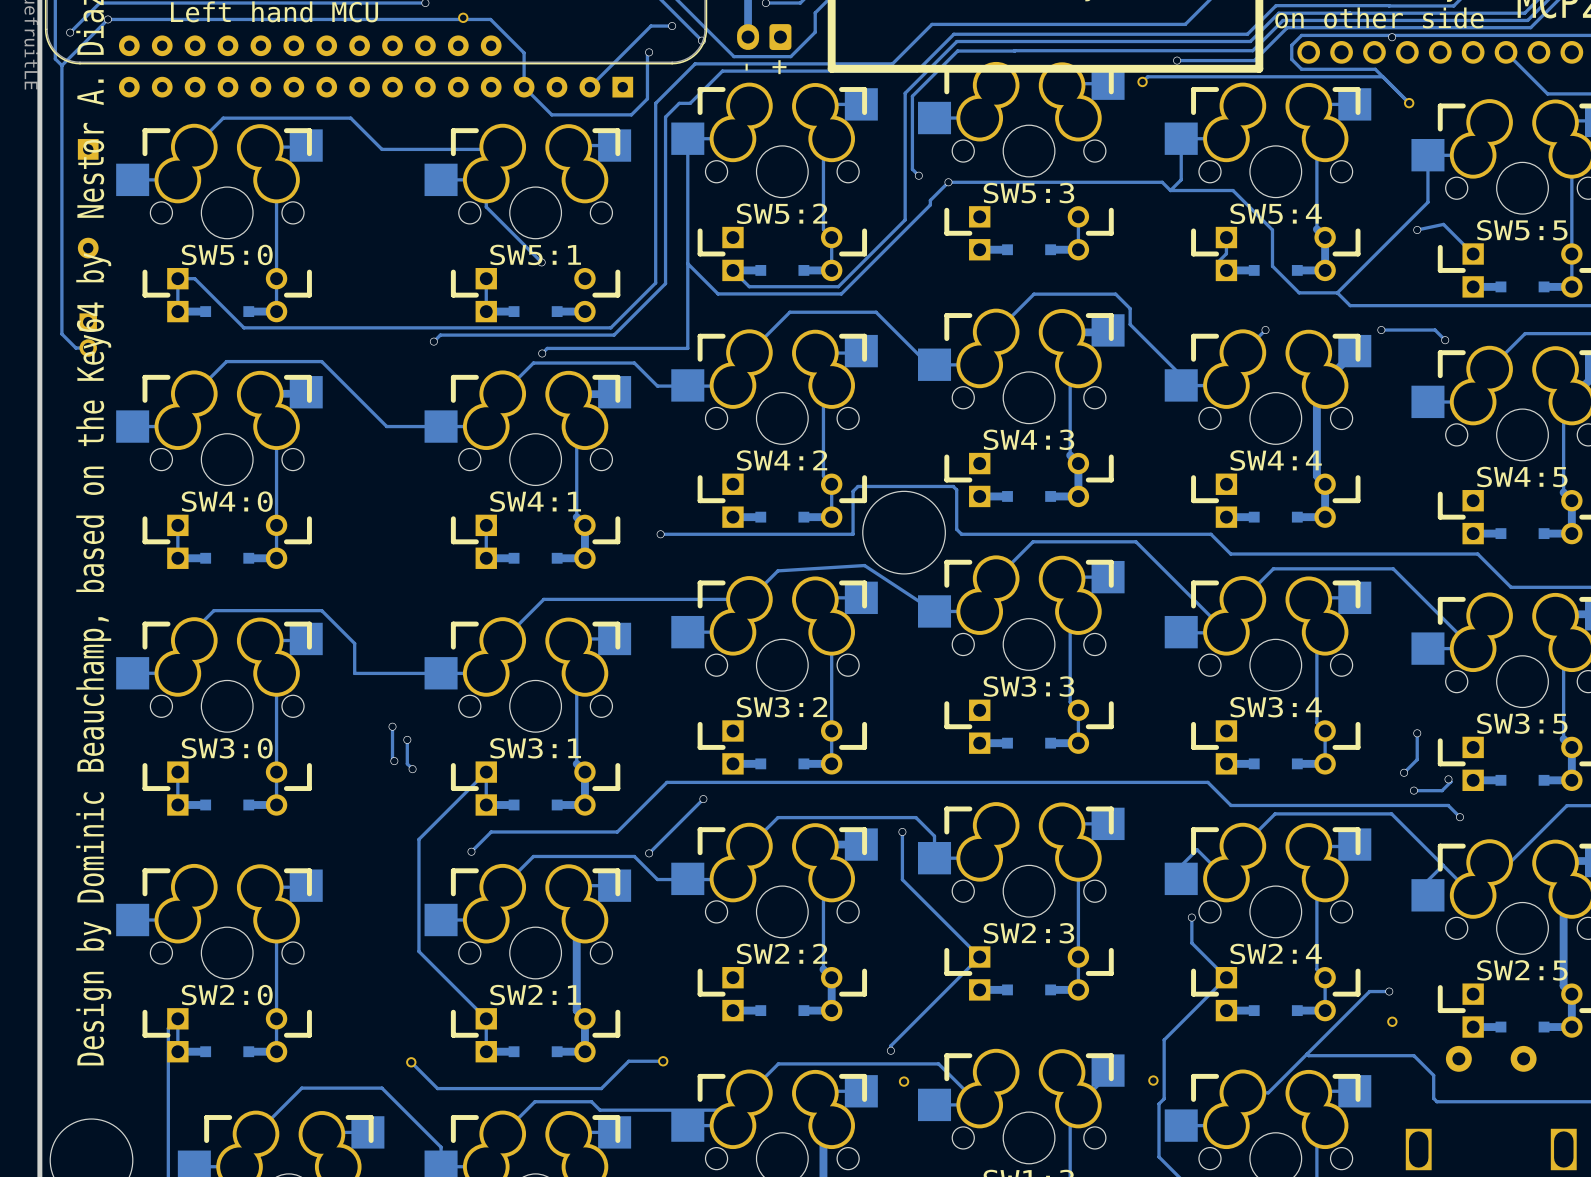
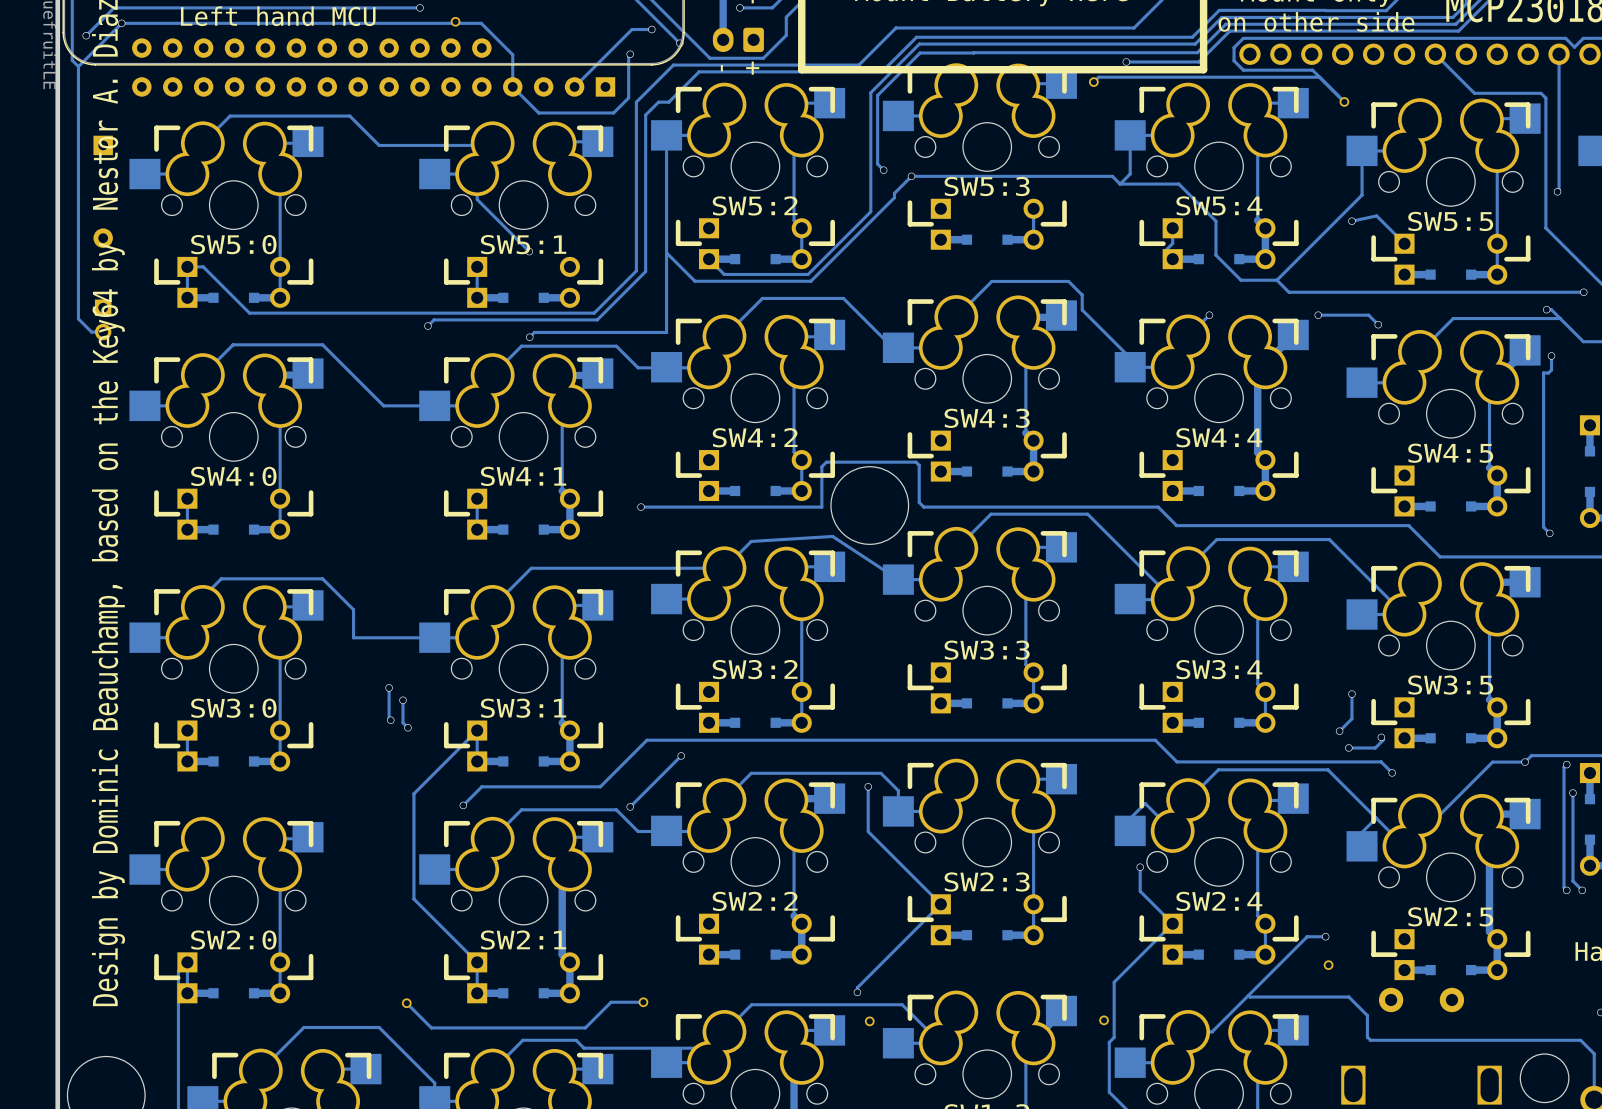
via: (1392, 37) -> none

